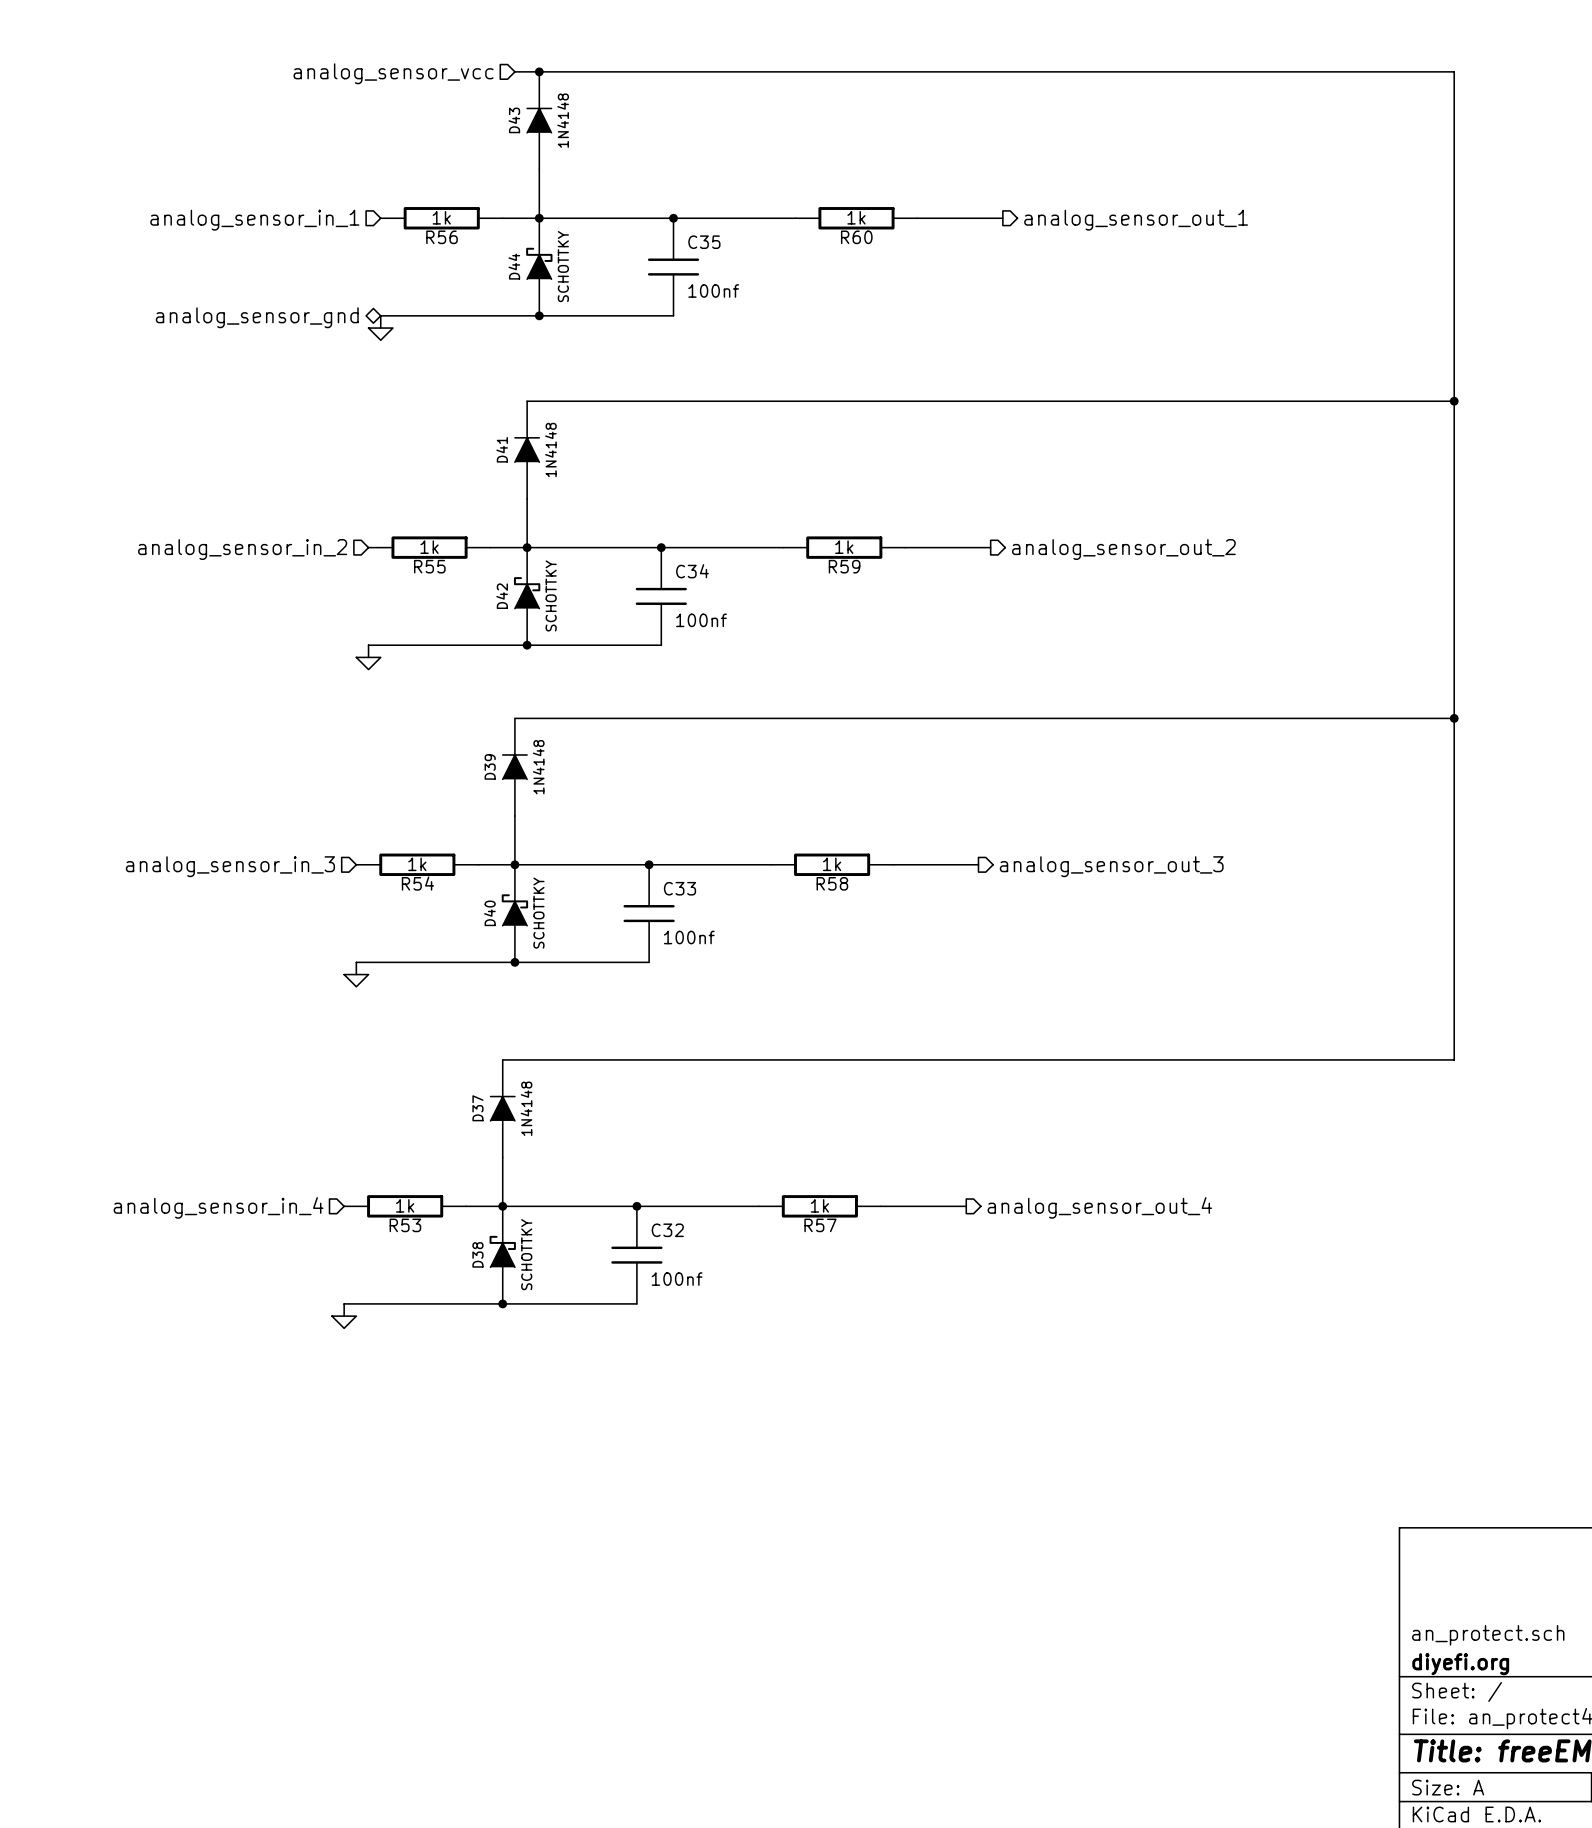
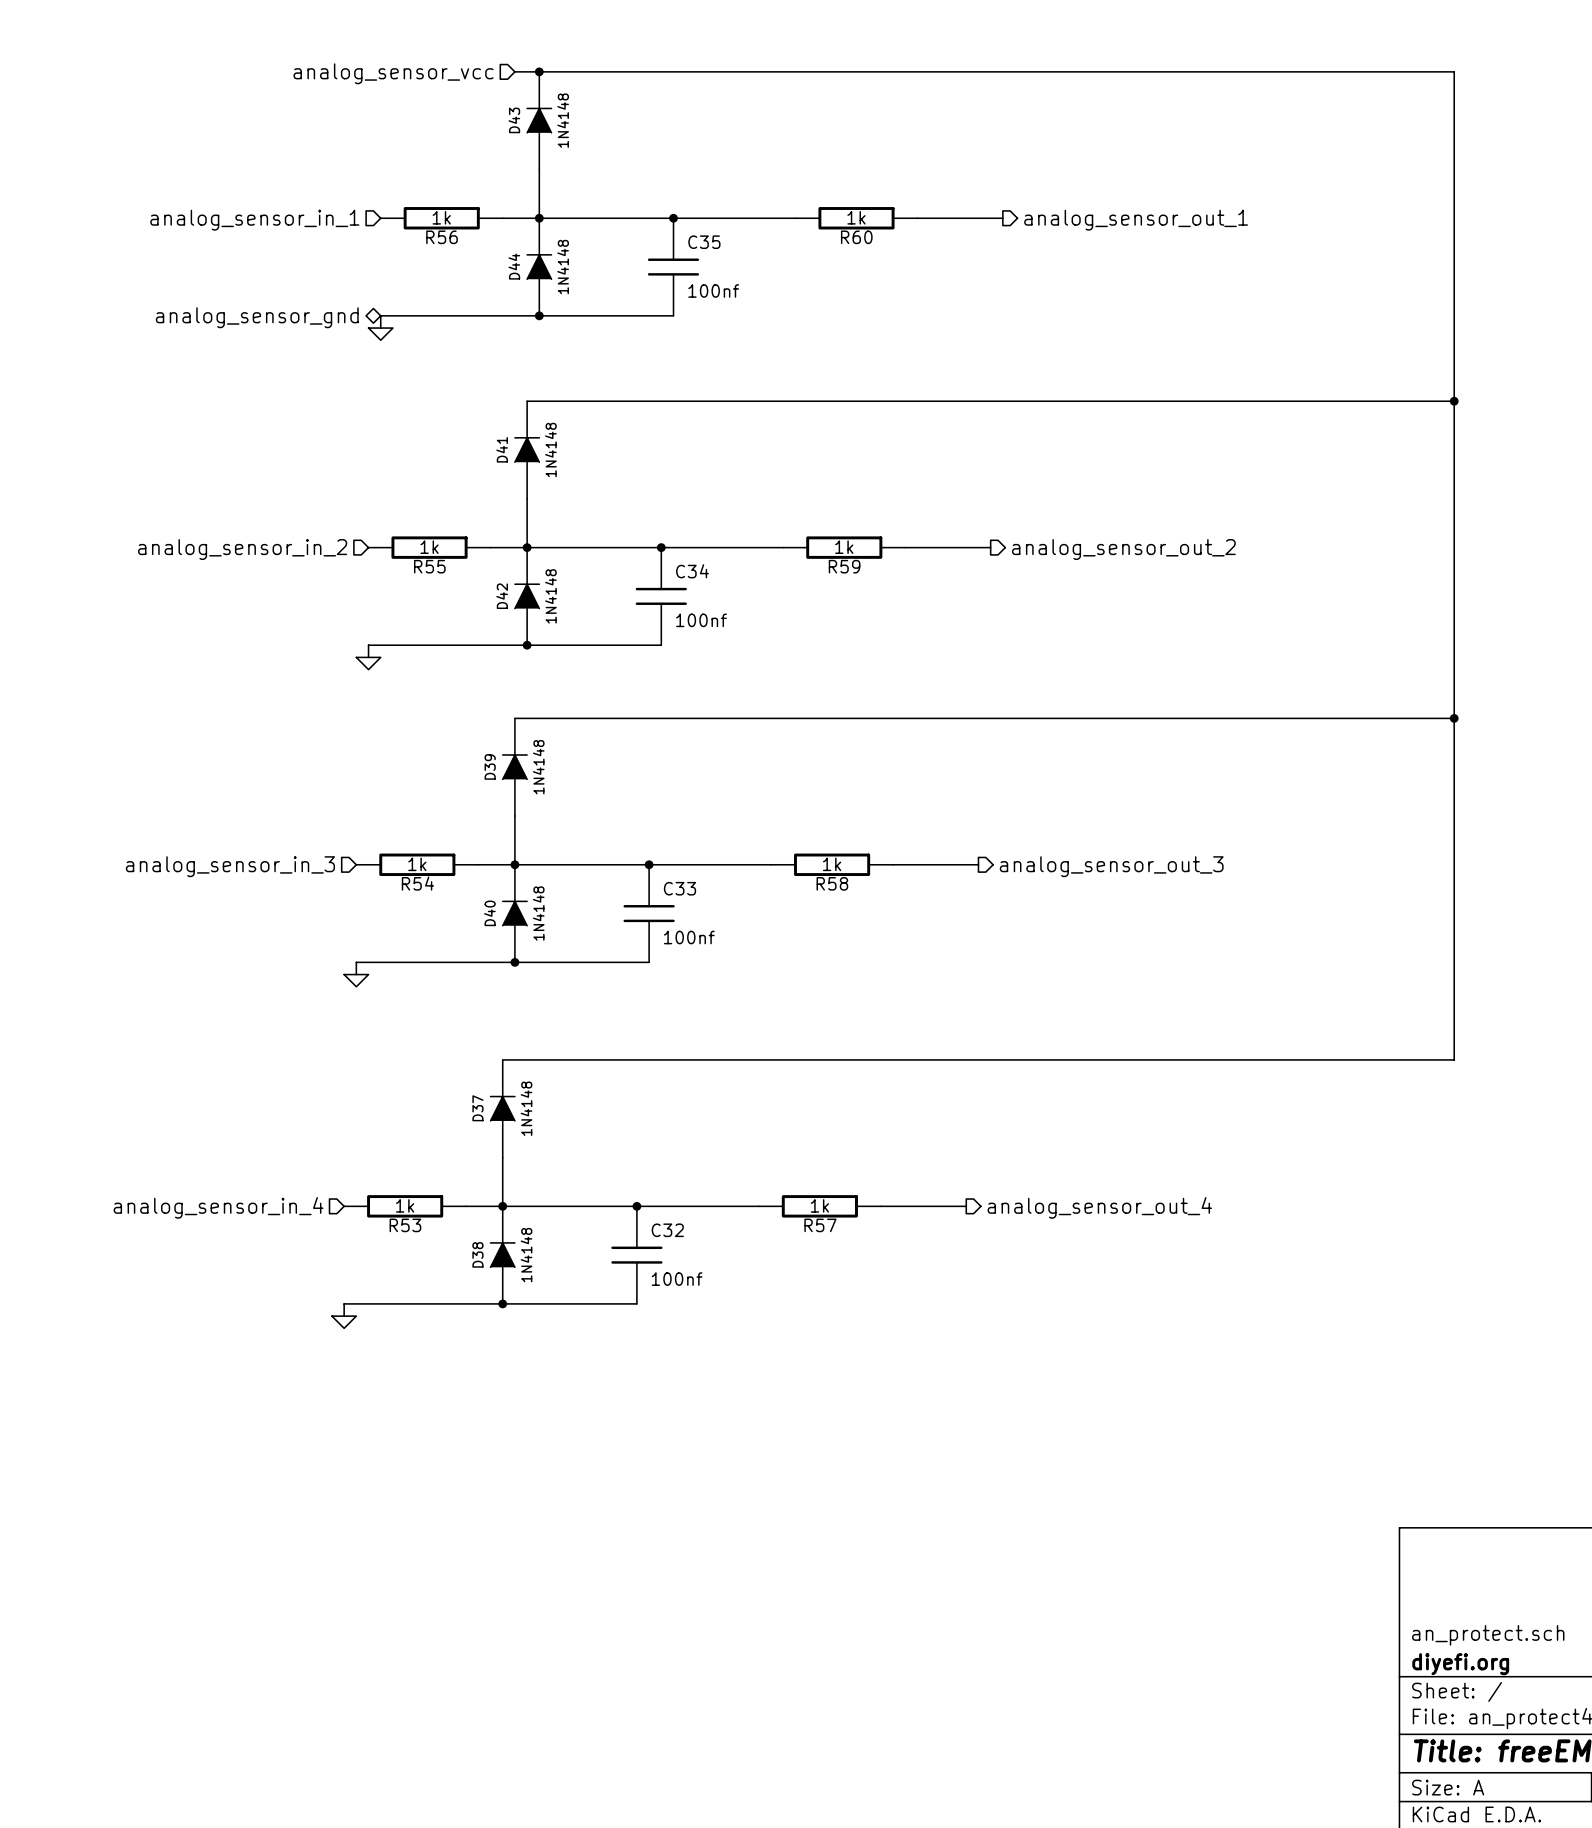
D44 symbol: [526, 218, 553, 316] -> [526, 218, 553, 316]
D44 value: SCHOTTKY (563, 266) -> 1N4148 (563, 267)
D42 symbol: [513, 547, 541, 646] -> [514, 547, 541, 646]
D42 value: SCHOTTKY (551, 595) -> 1N4148 (550, 596)
D40 symbol: [501, 864, 529, 963] -> [501, 864, 528, 963]
D40 value: SCHOTTKY (538, 913) -> 1N4148 (538, 913)
D38 symbol: [489, 1206, 516, 1304] -> [489, 1206, 516, 1304]
D38 value: SCHOTTKY (526, 1254) -> 1N4148 (526, 1255)

